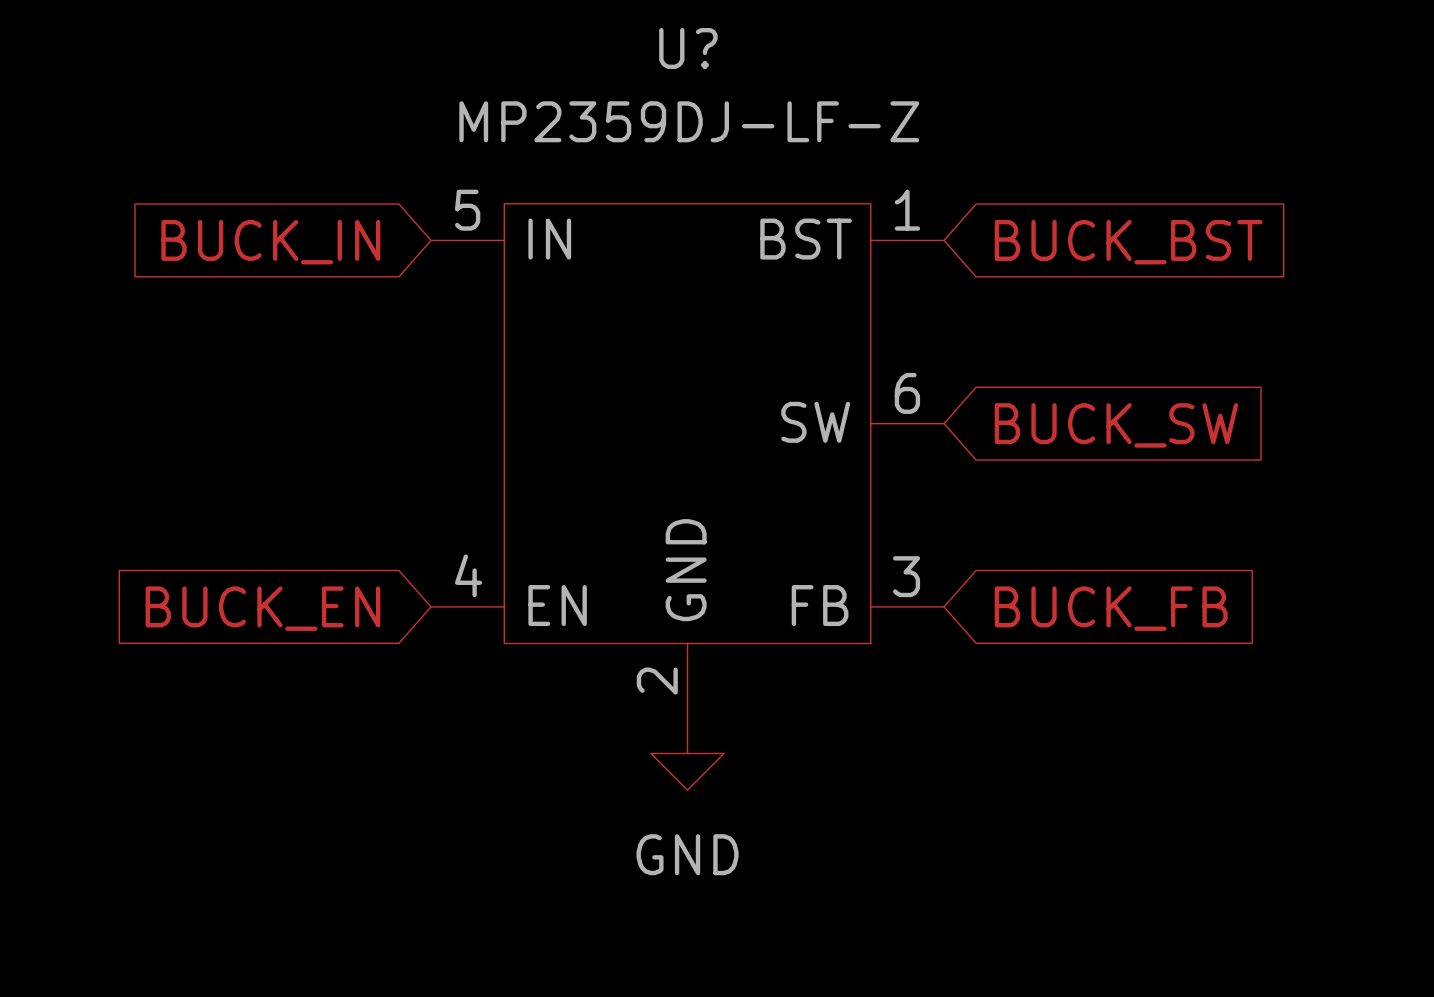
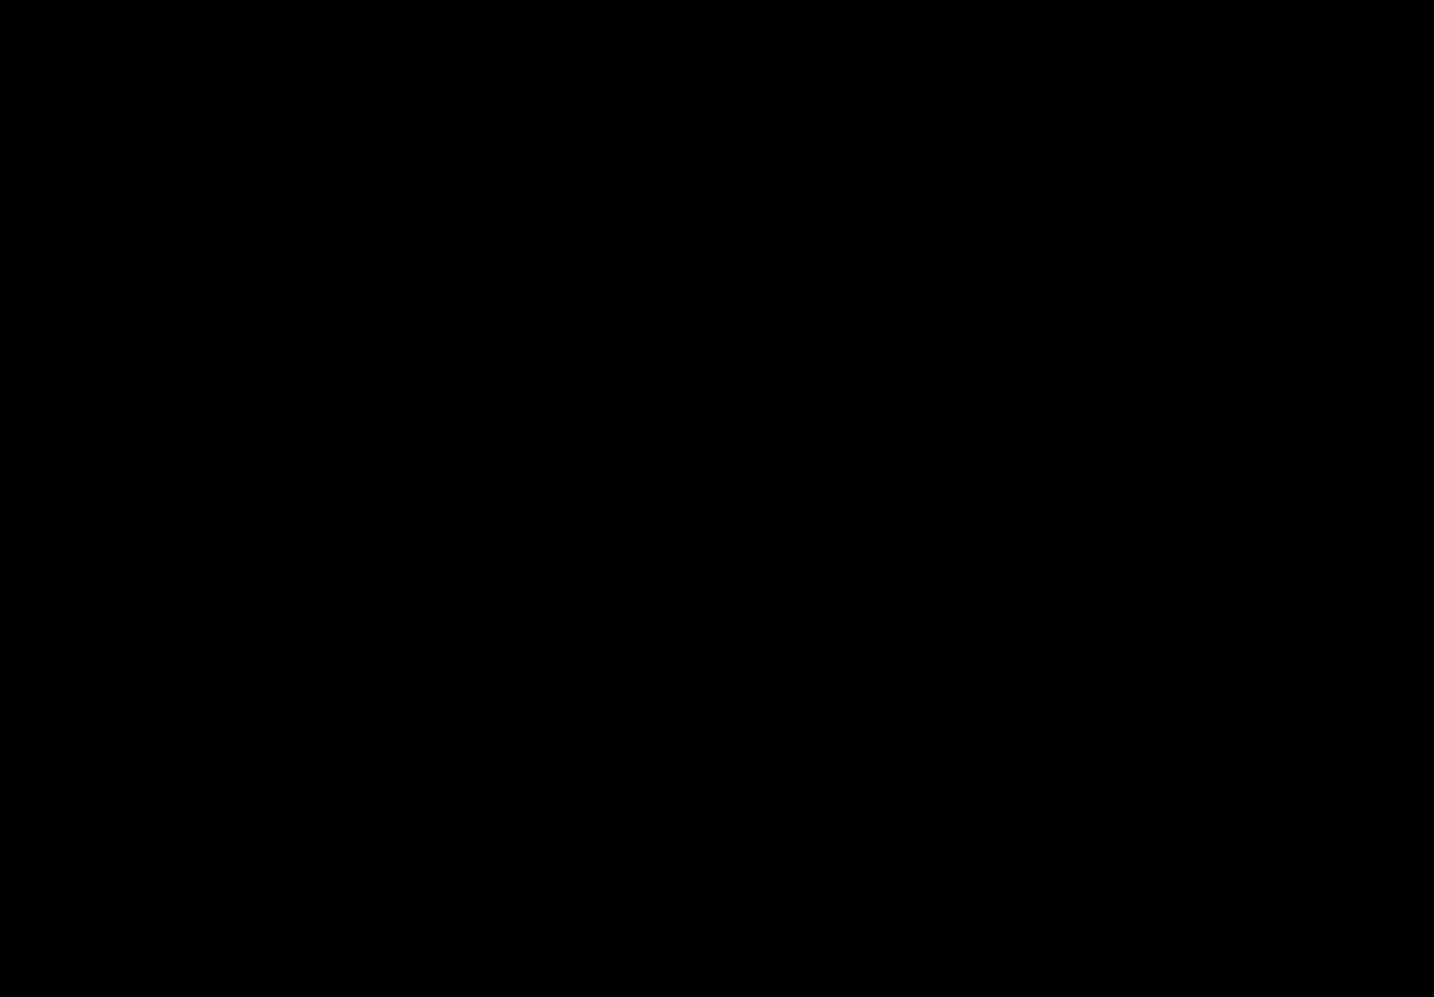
global label: BUCK_IN (270, 242) -> none
global label: BUCK_BST (1128, 242) -> none
global label: BUCK_SW (1116, 425) -> none
U?: MP2359DJ-LF-Z (687, 460) -> none
global label: BUCK_EN (262, 608) -> none
global label: BUCK_FB (1111, 608) -> none
power symbol: GND (687, 753) -> none

